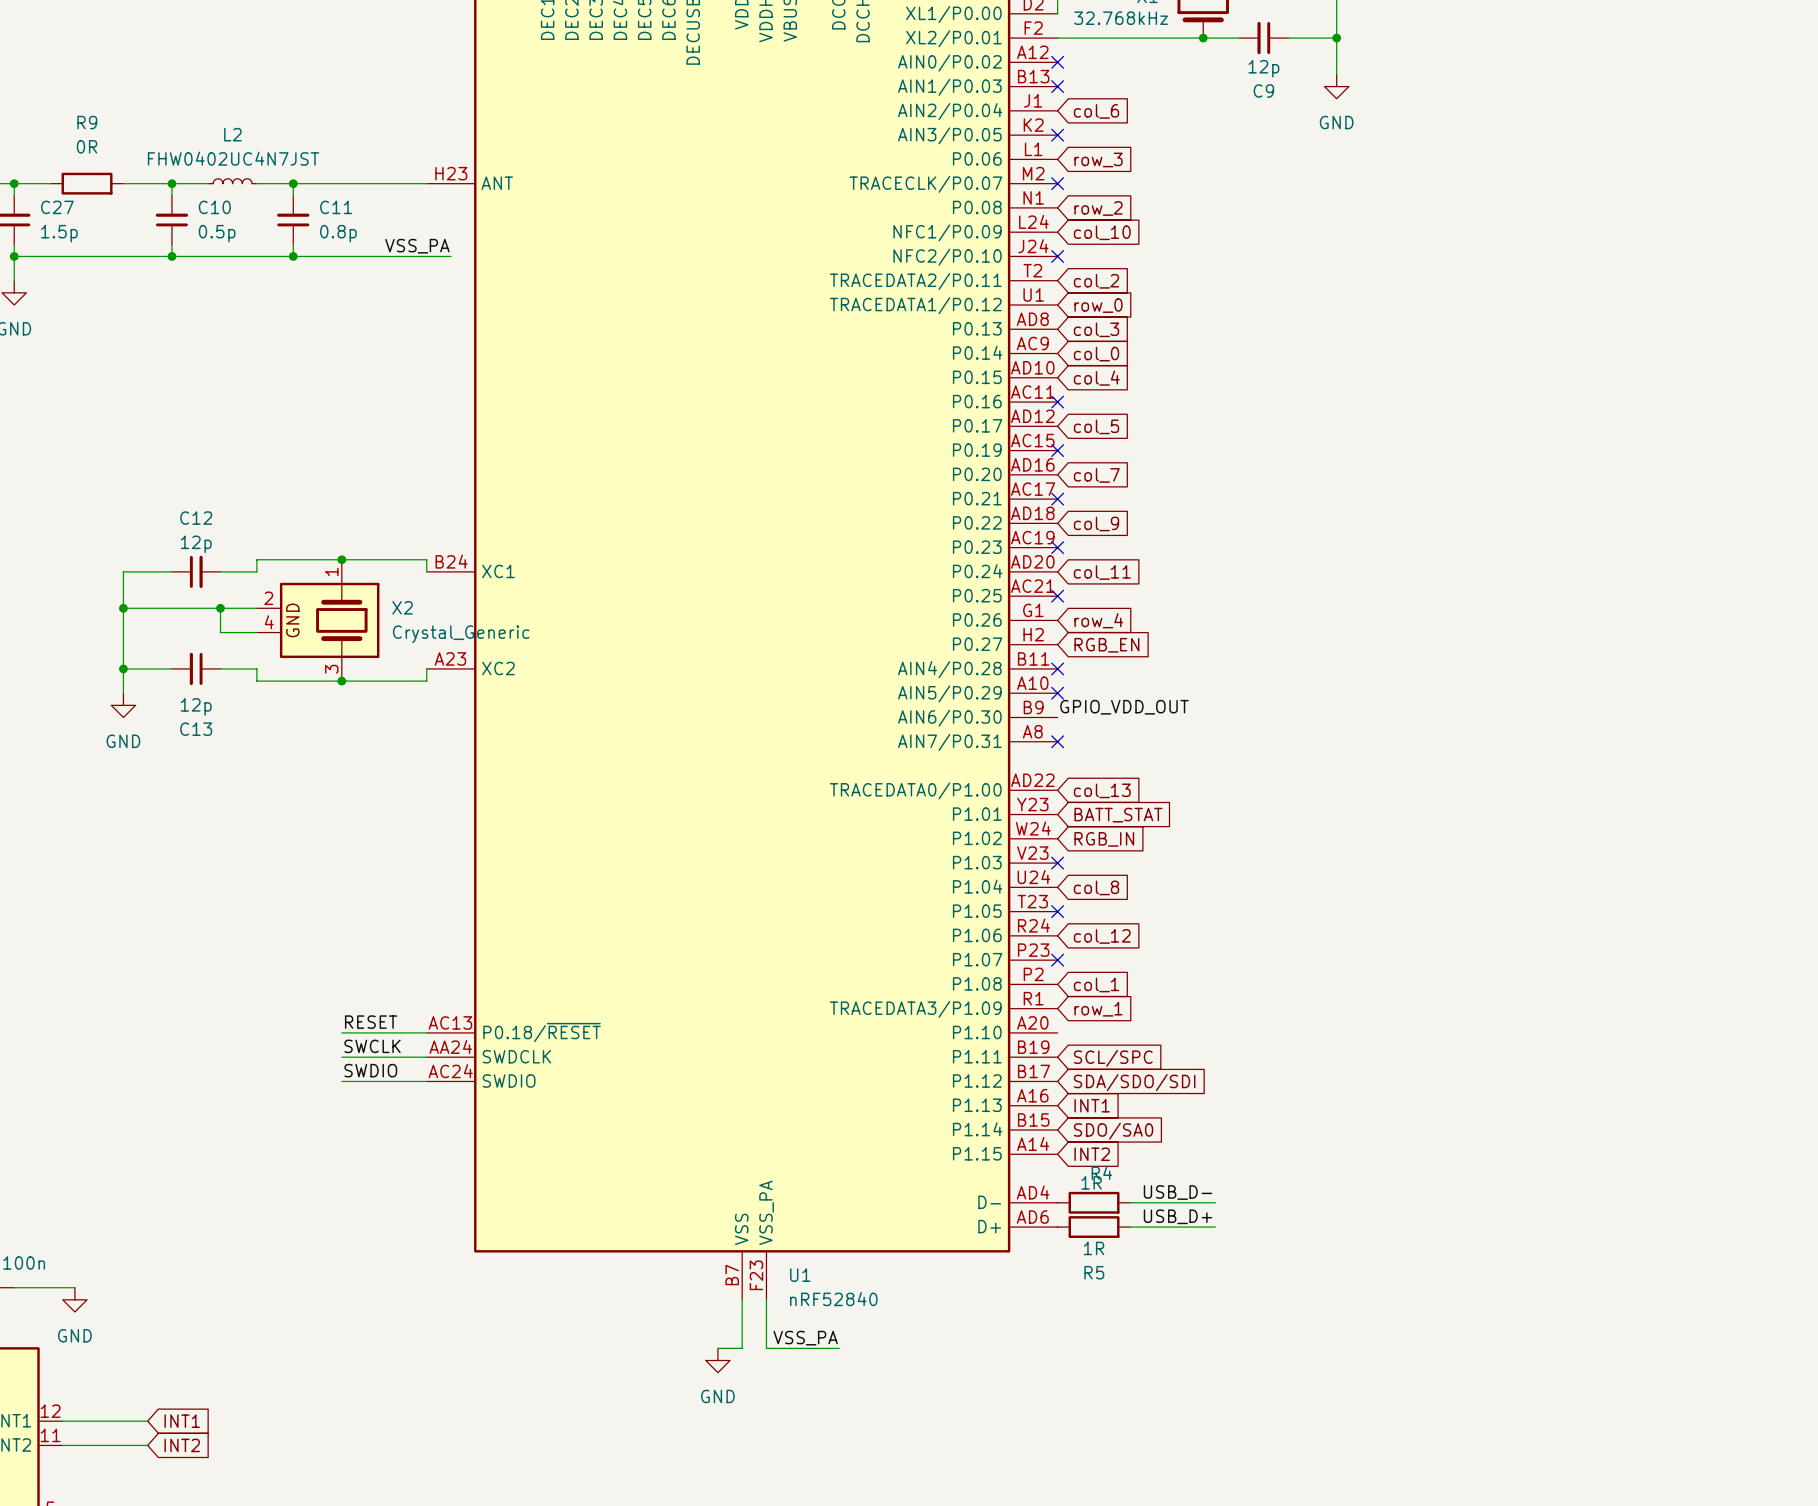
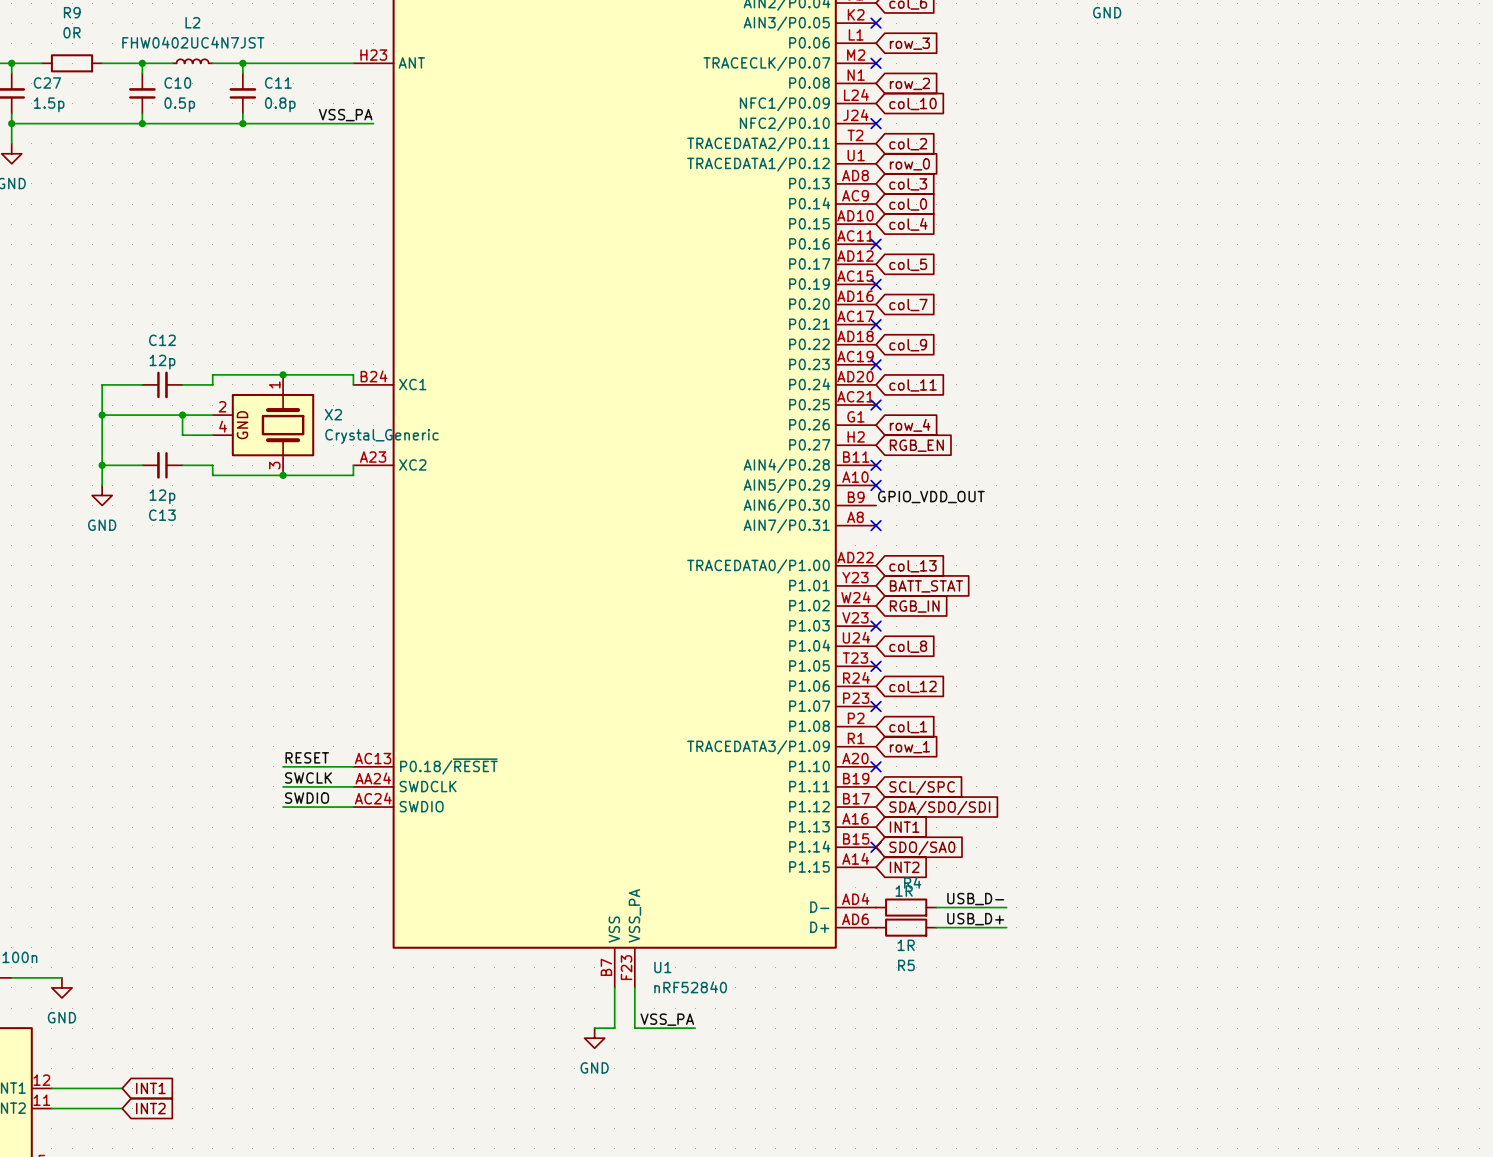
no-connect mark: none -> (876, 766)
no-connect mark: none -> (876, 847)

